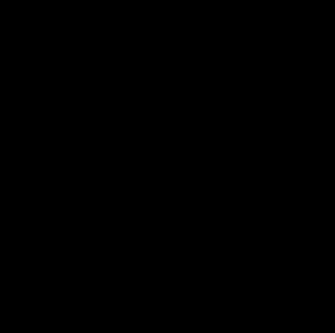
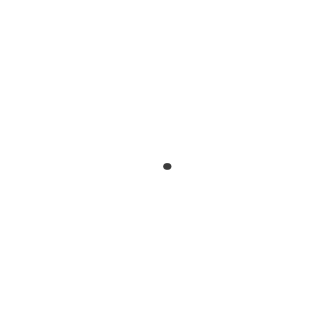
line: none -> (166, 166) (168, 166)

